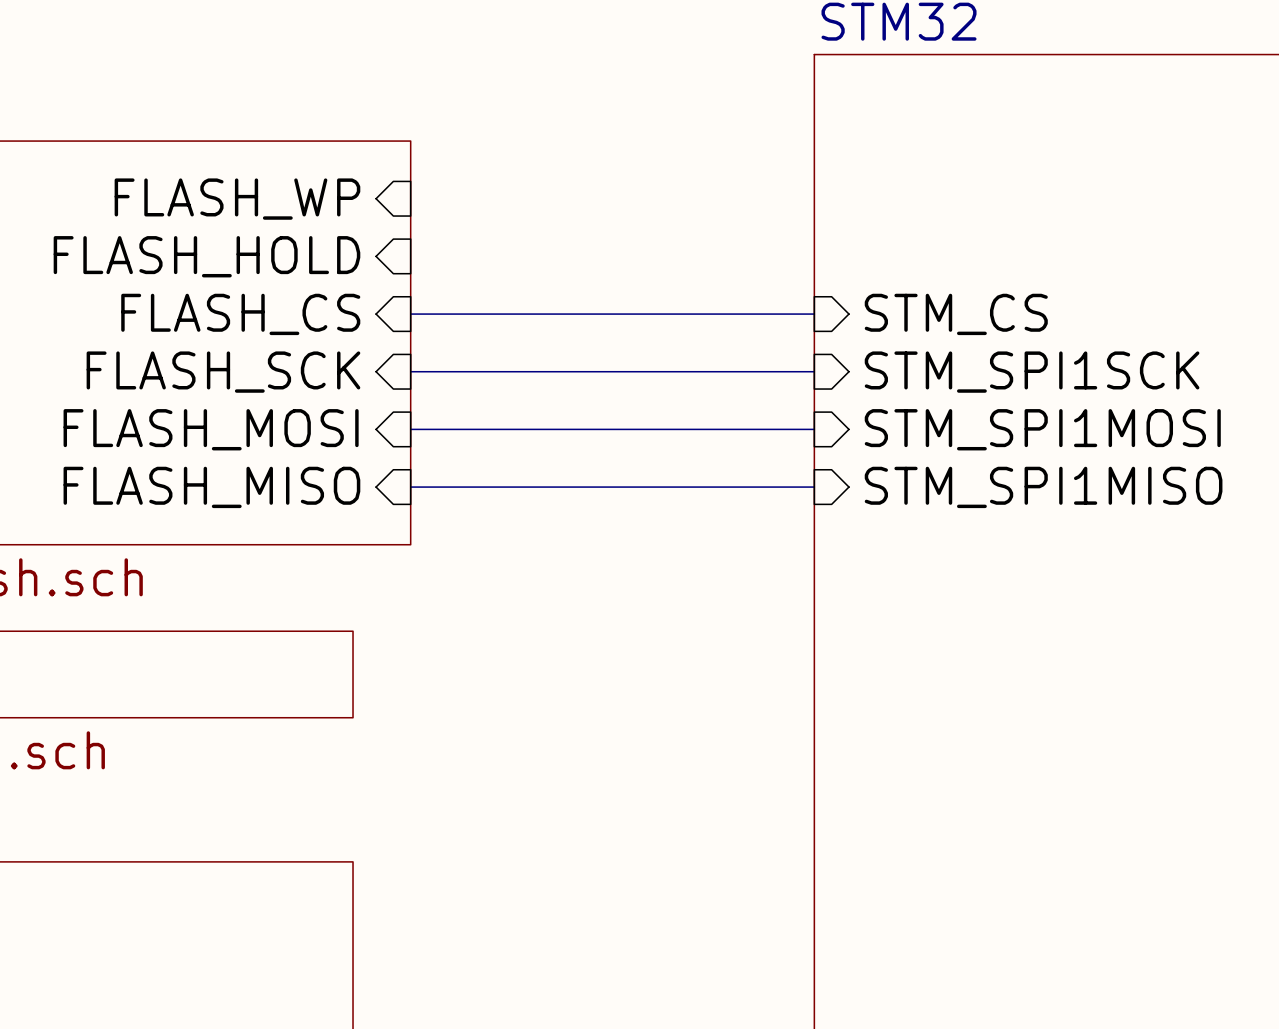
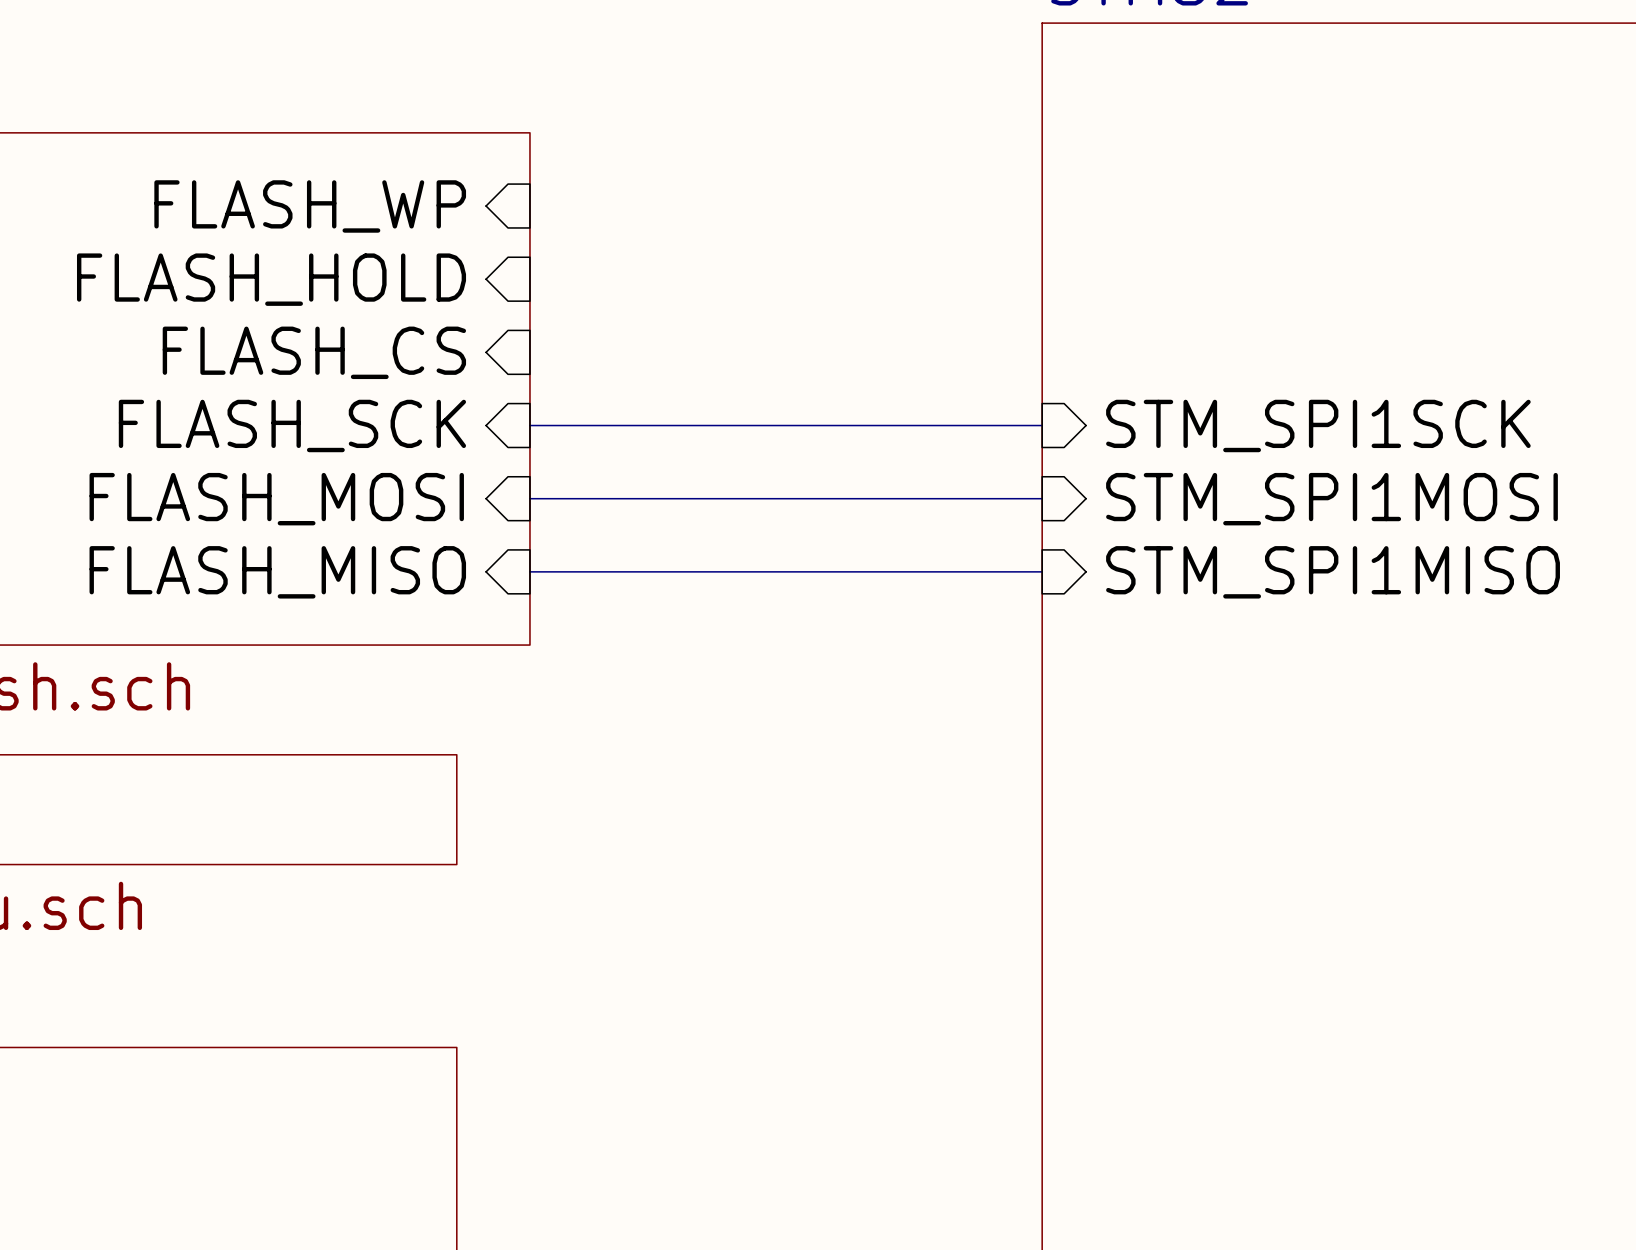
wire: (410, 314) (814, 314) -> none
sheet pin: STM_CS (956, 314) -> none

